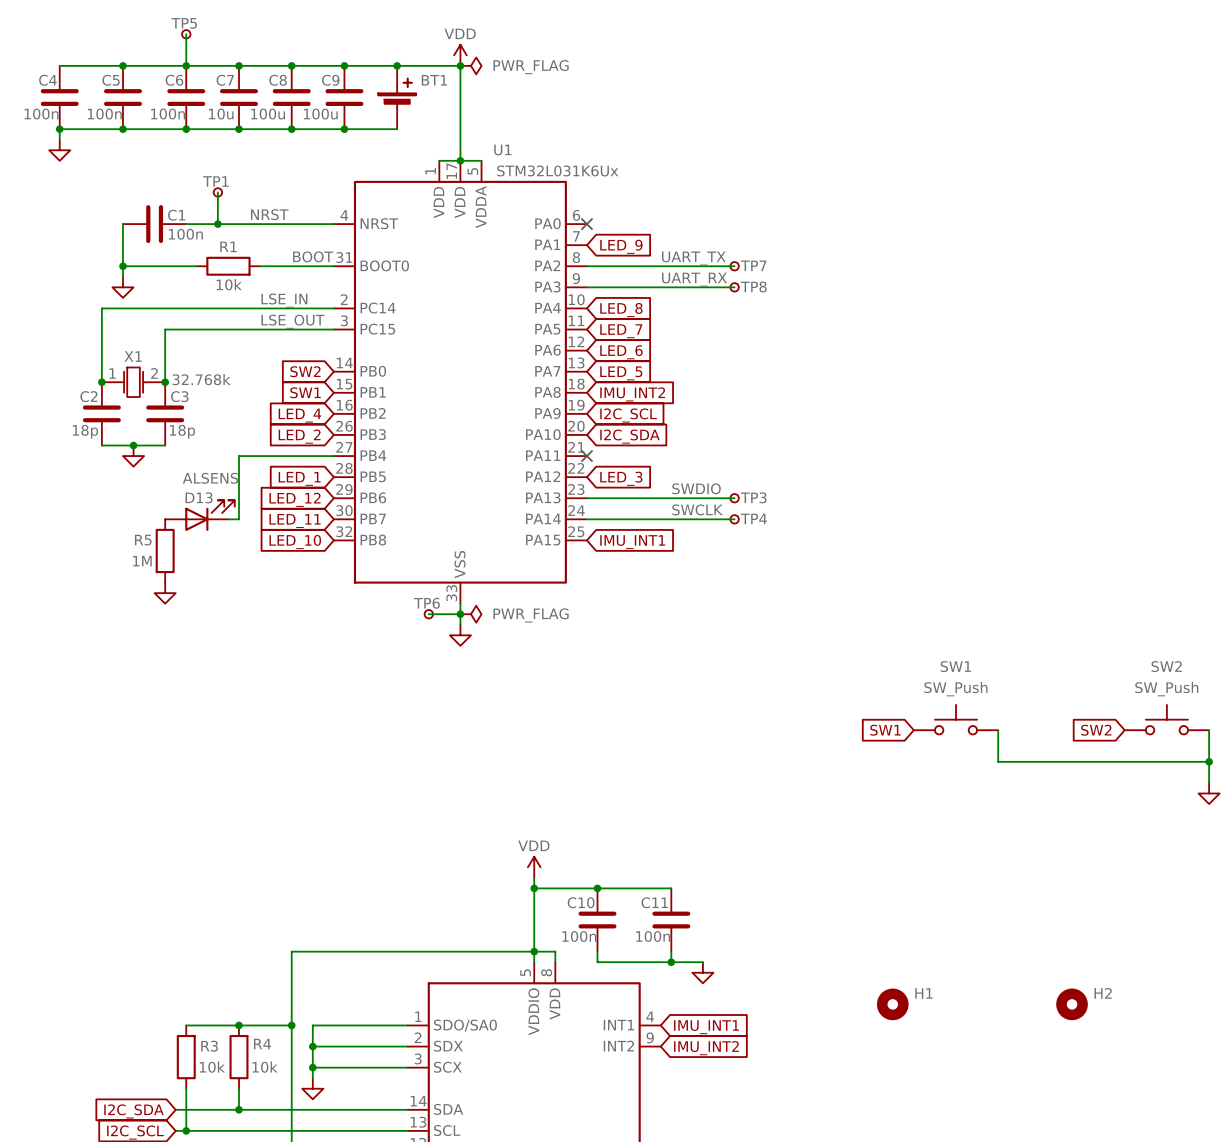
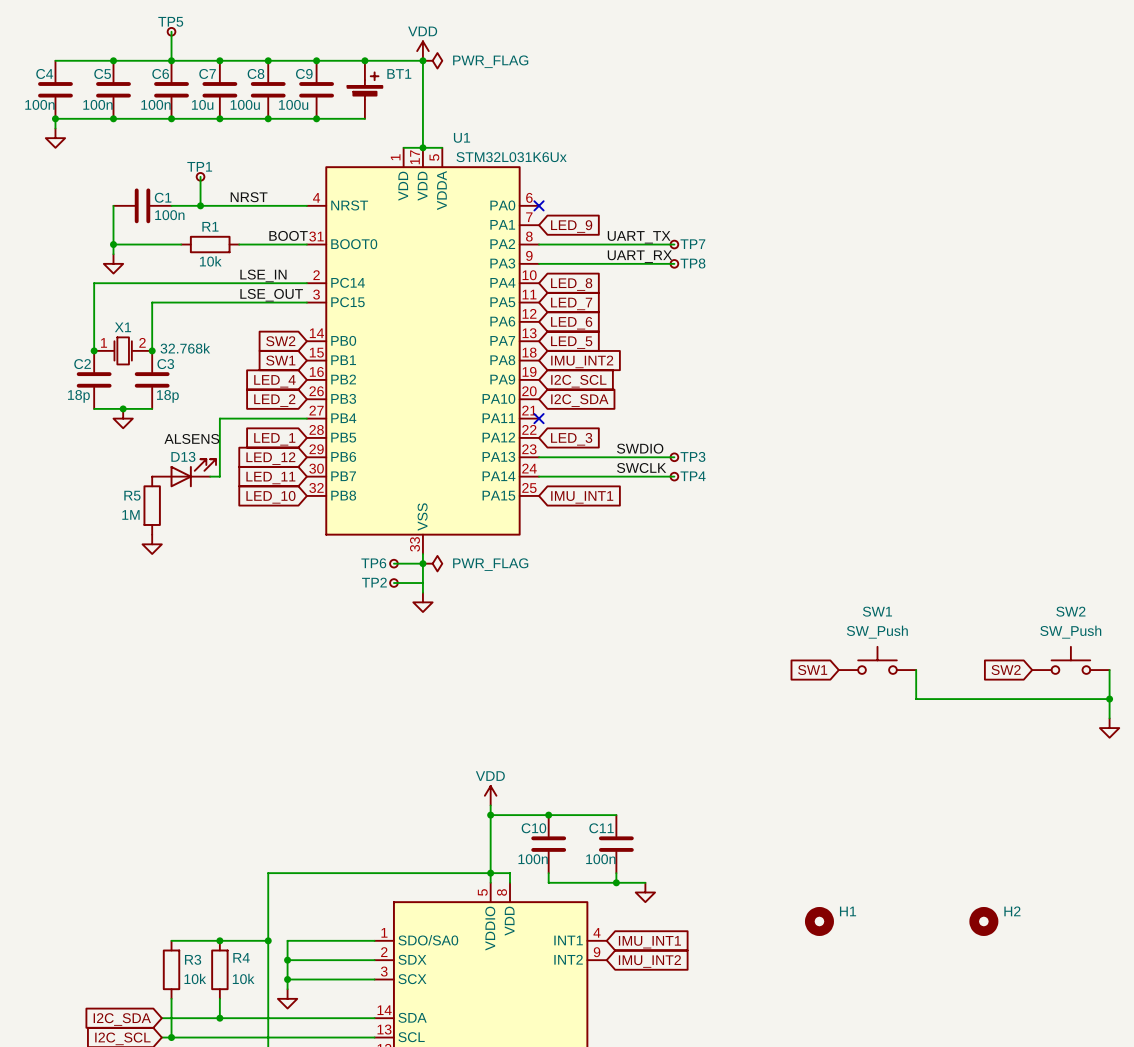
TP6 name position: TP6 (426, 603) -> TP6 (373, 563)
wire: none -> (393, 583) (422, 583)
TP2: none -> (393, 583)
power symbol position: (460, 635) -> (422, 602)

